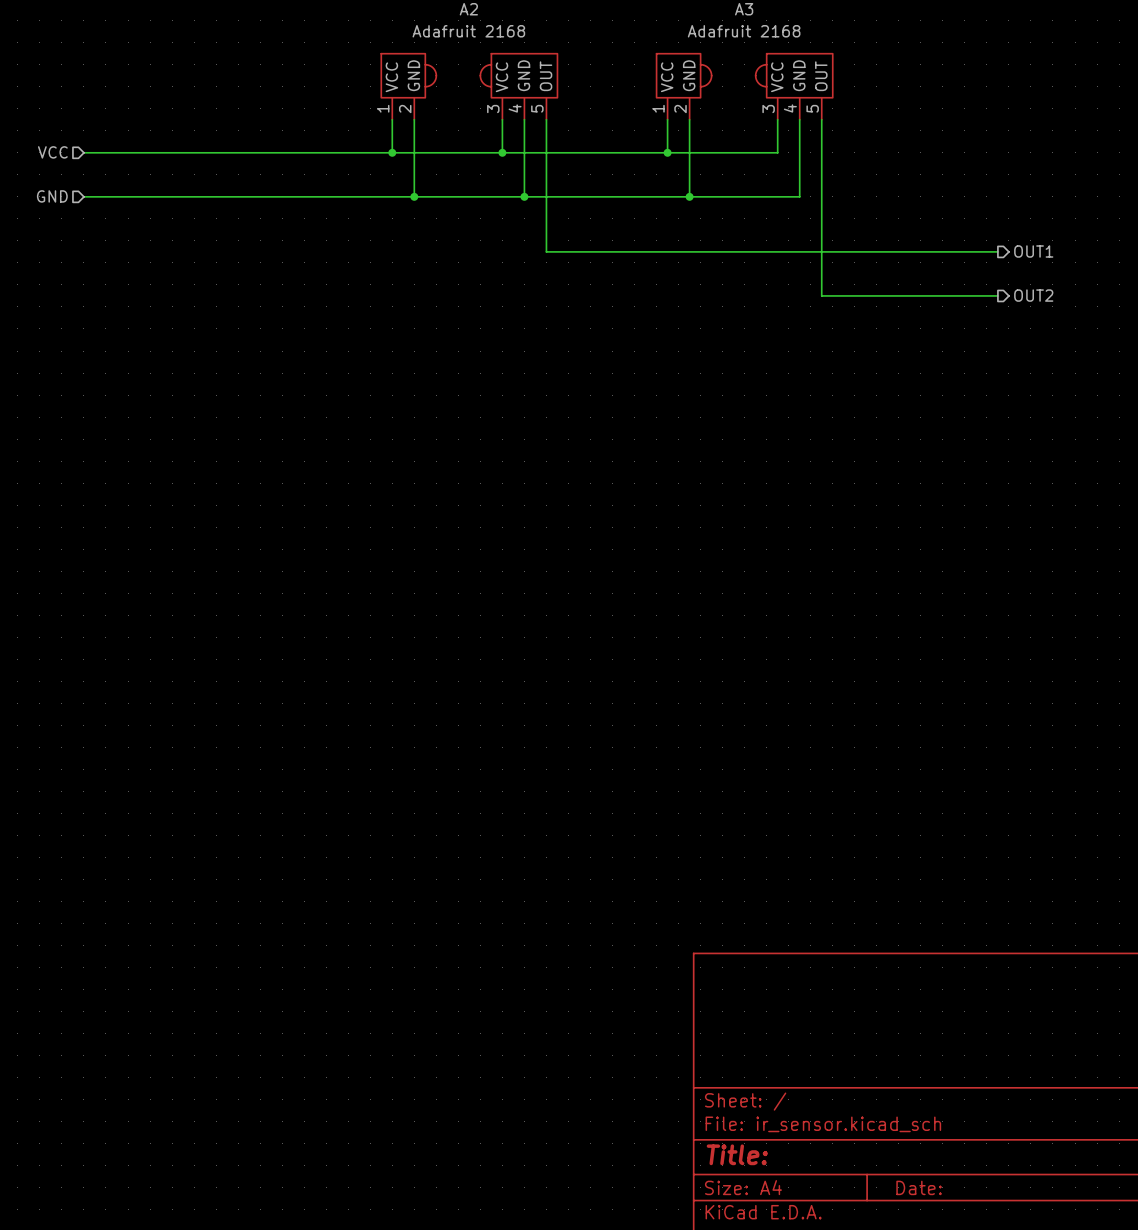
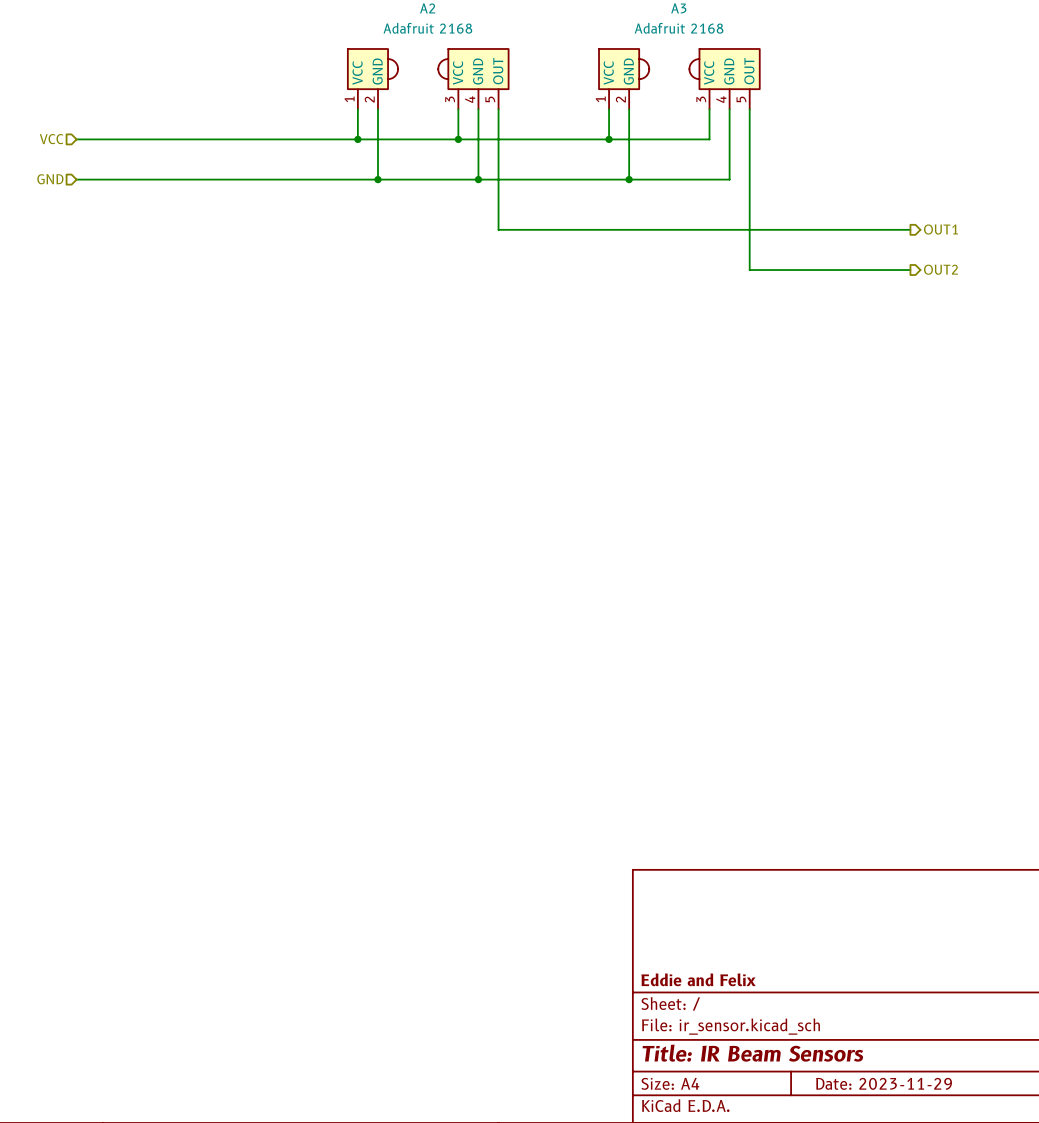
title block: none -> Eddie and Felix (698, 979)
title block: Title: (737, 1154) -> Title: IR Beam Sensors (752, 1053)
title block: Date: (919, 1187) -> Date: 2023-11-29 (884, 1083)

